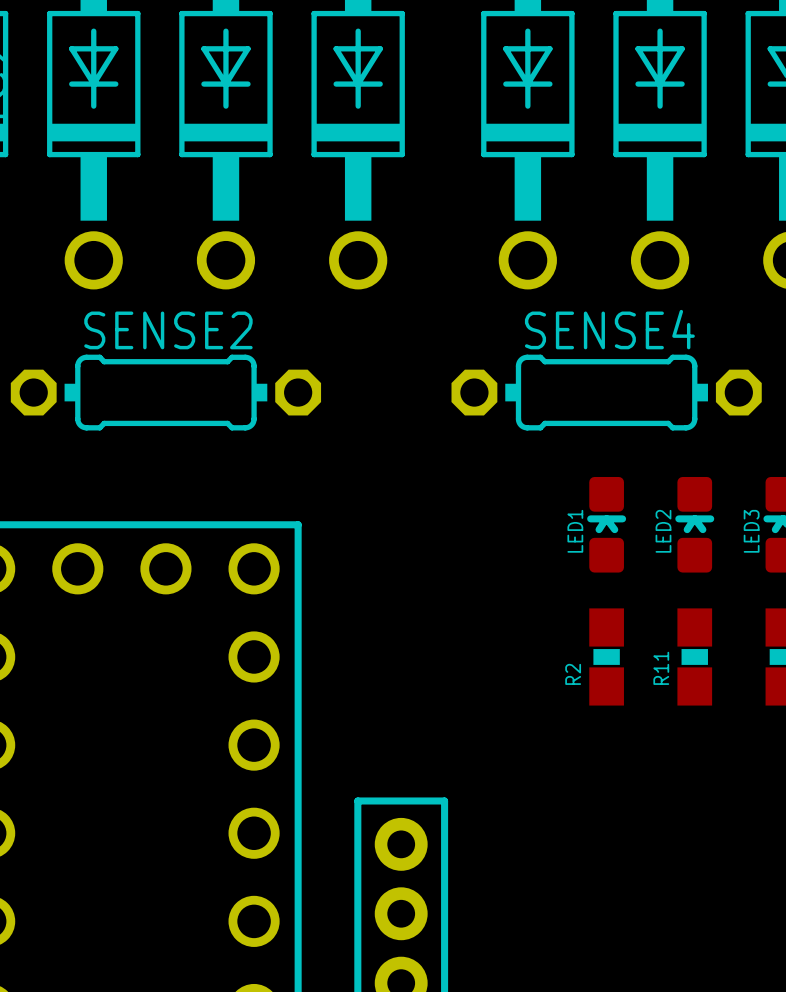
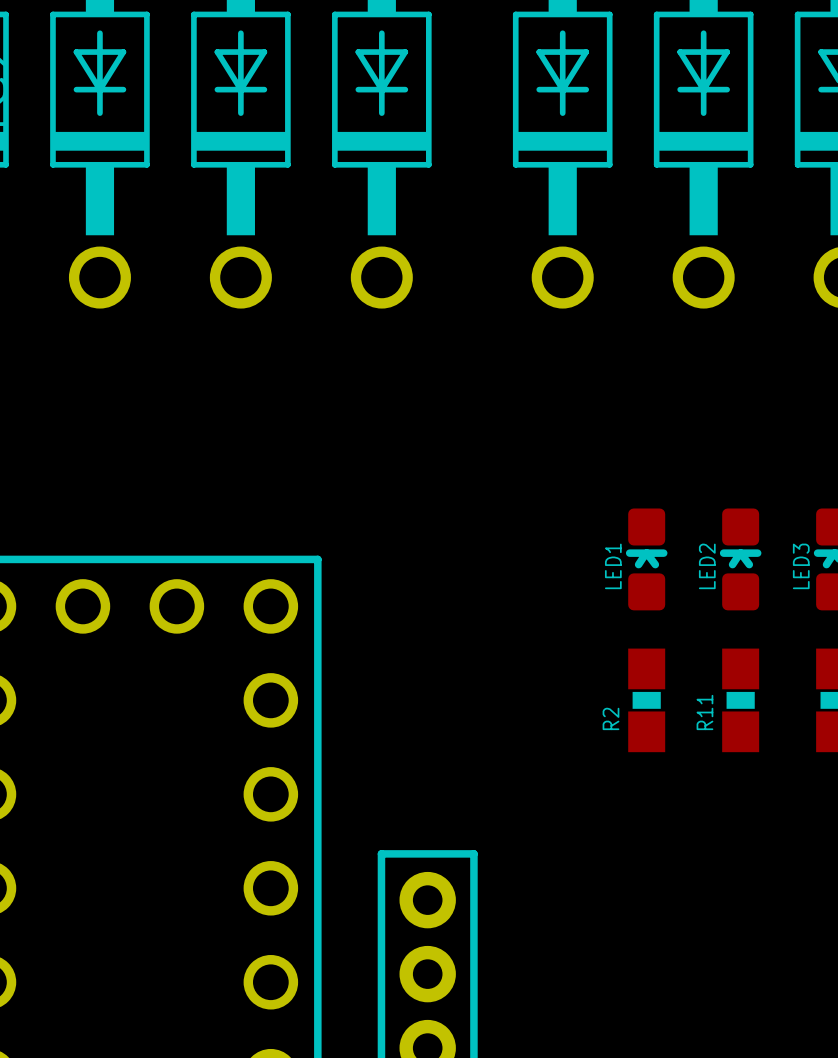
SENSE2: (165, 392) -> none
SENSE4: (606, 392) -> none

